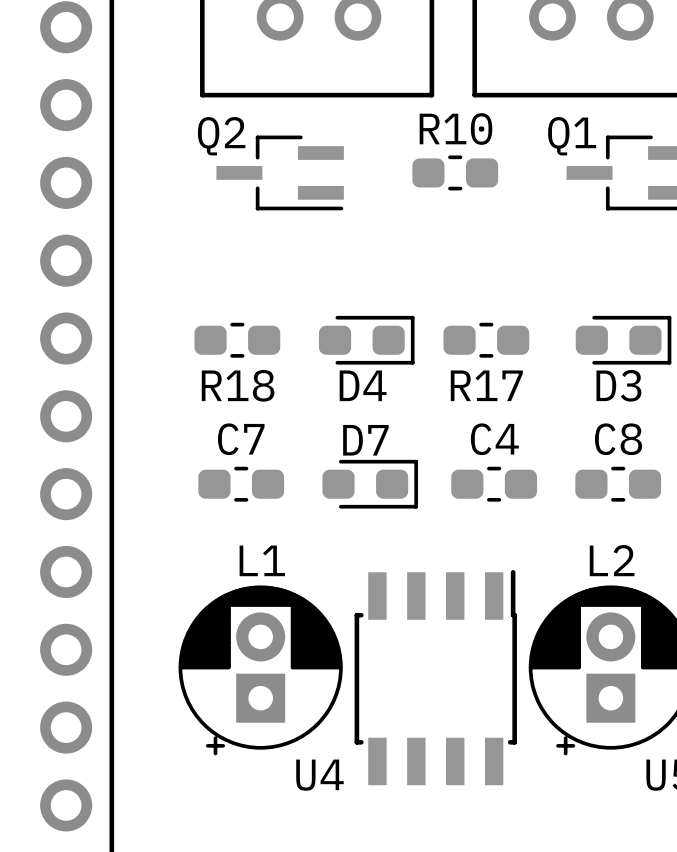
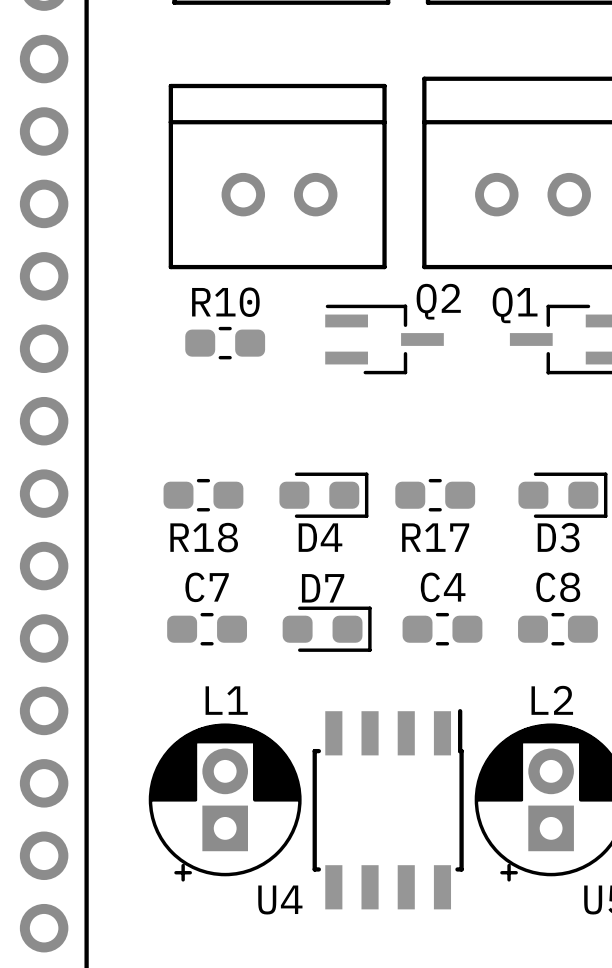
Q2 name position: Q2 (221, 136) -> Q2 (438, 301)
R10 position: (455, 172) -> (225, 343)
Q2 rotation: 0° (280, 173) -> 180° (384, 339)
Q2 position: (280, 173) -> (384, 339)

